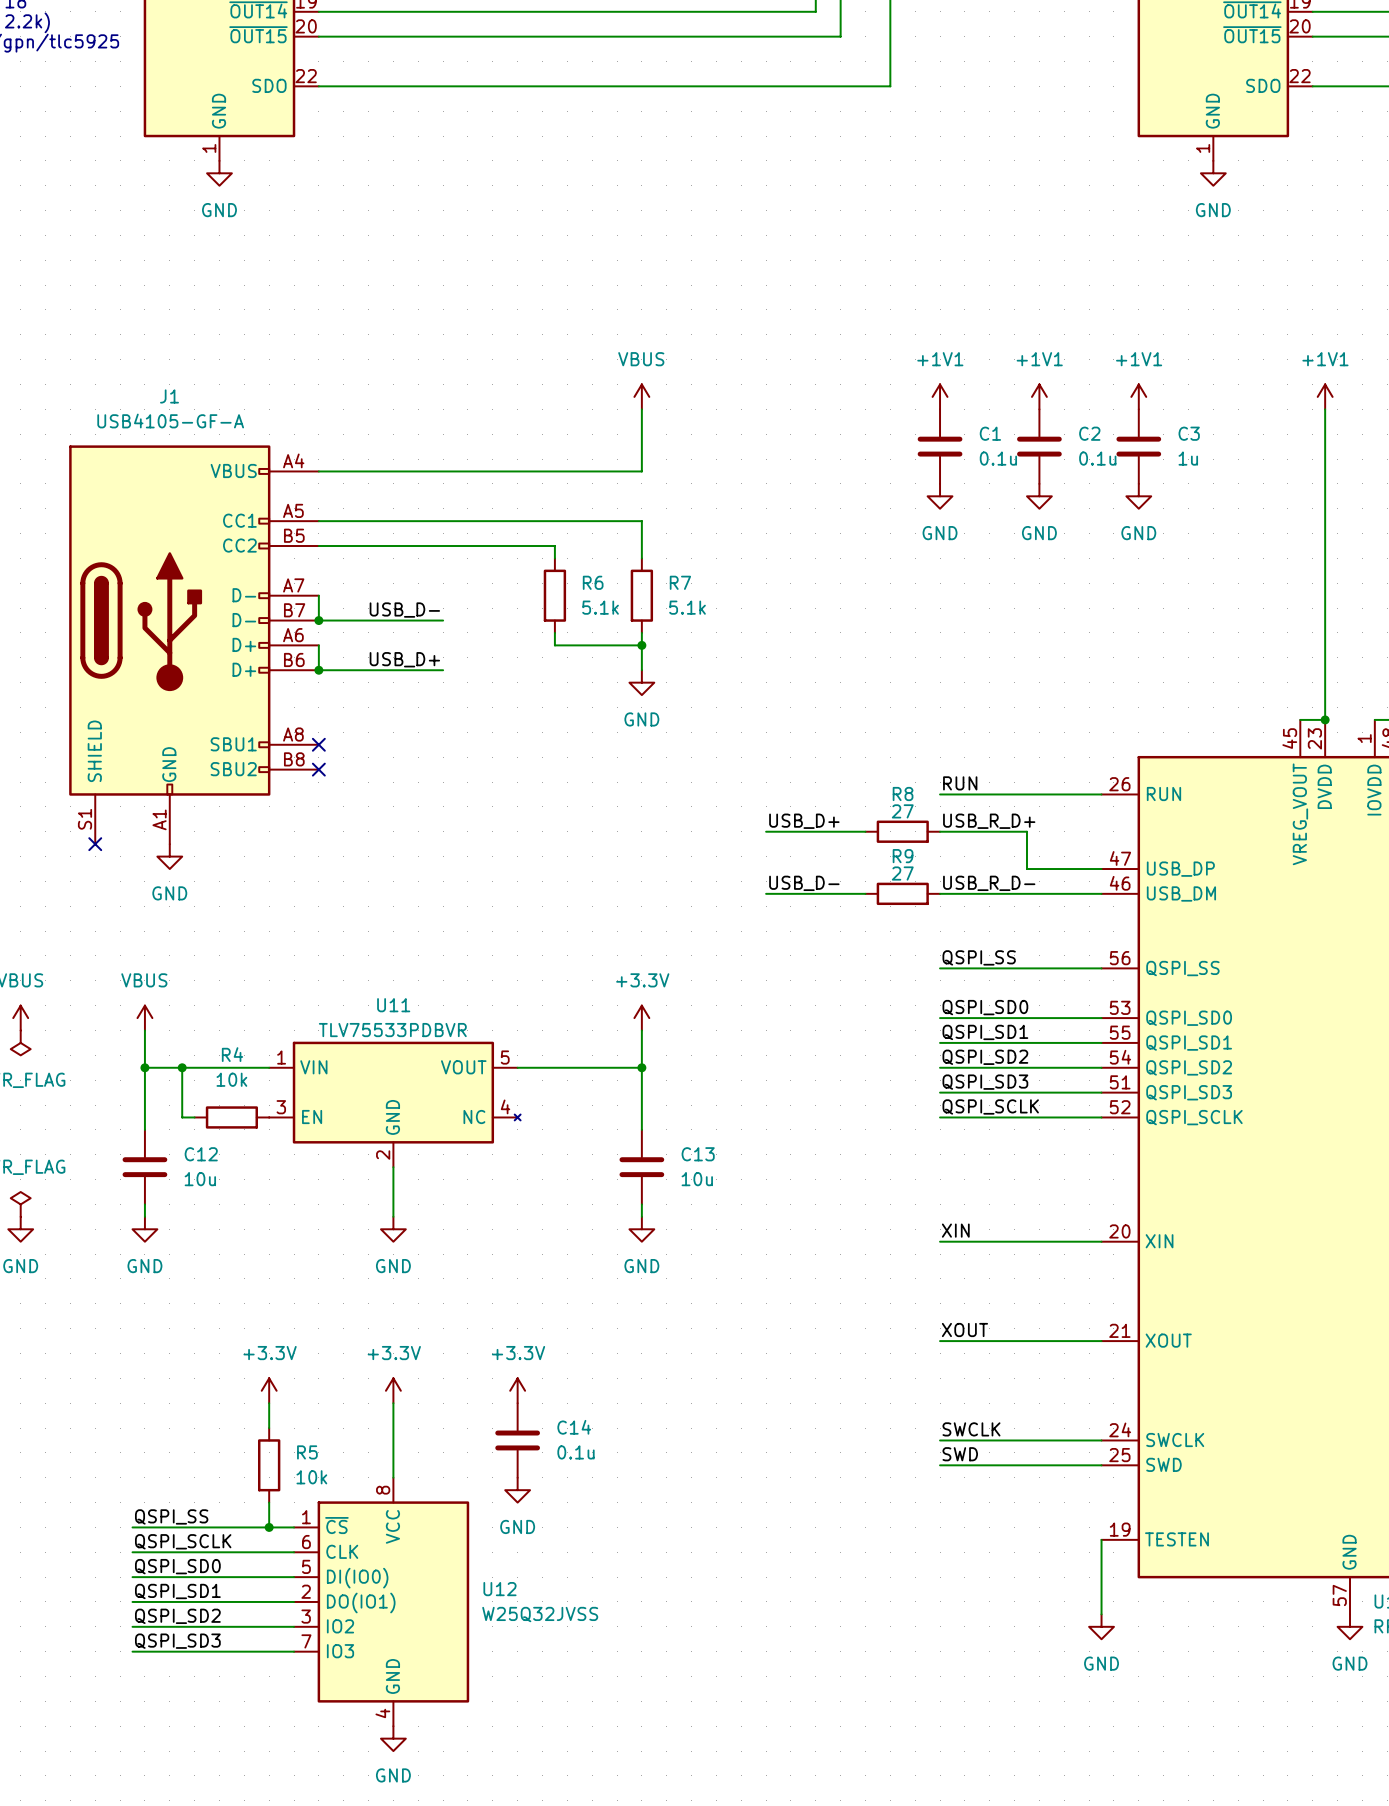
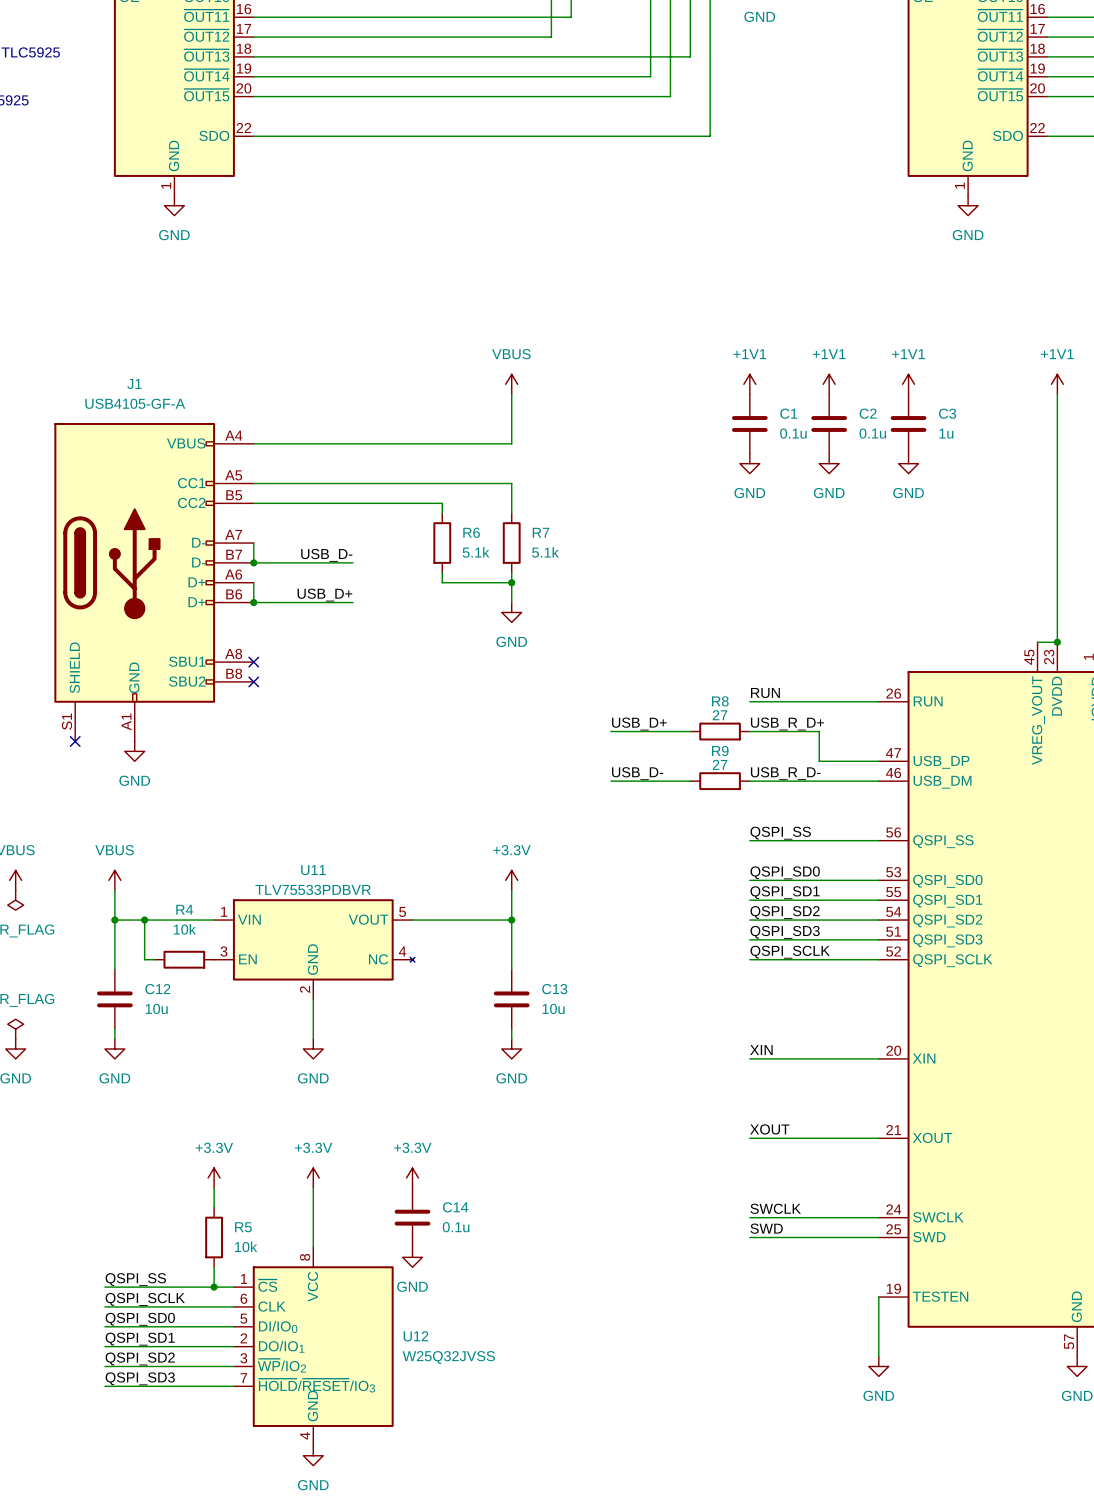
U12 symbol: [294, 1477, 470, 1727] -> [233, 1247, 394, 1446]

